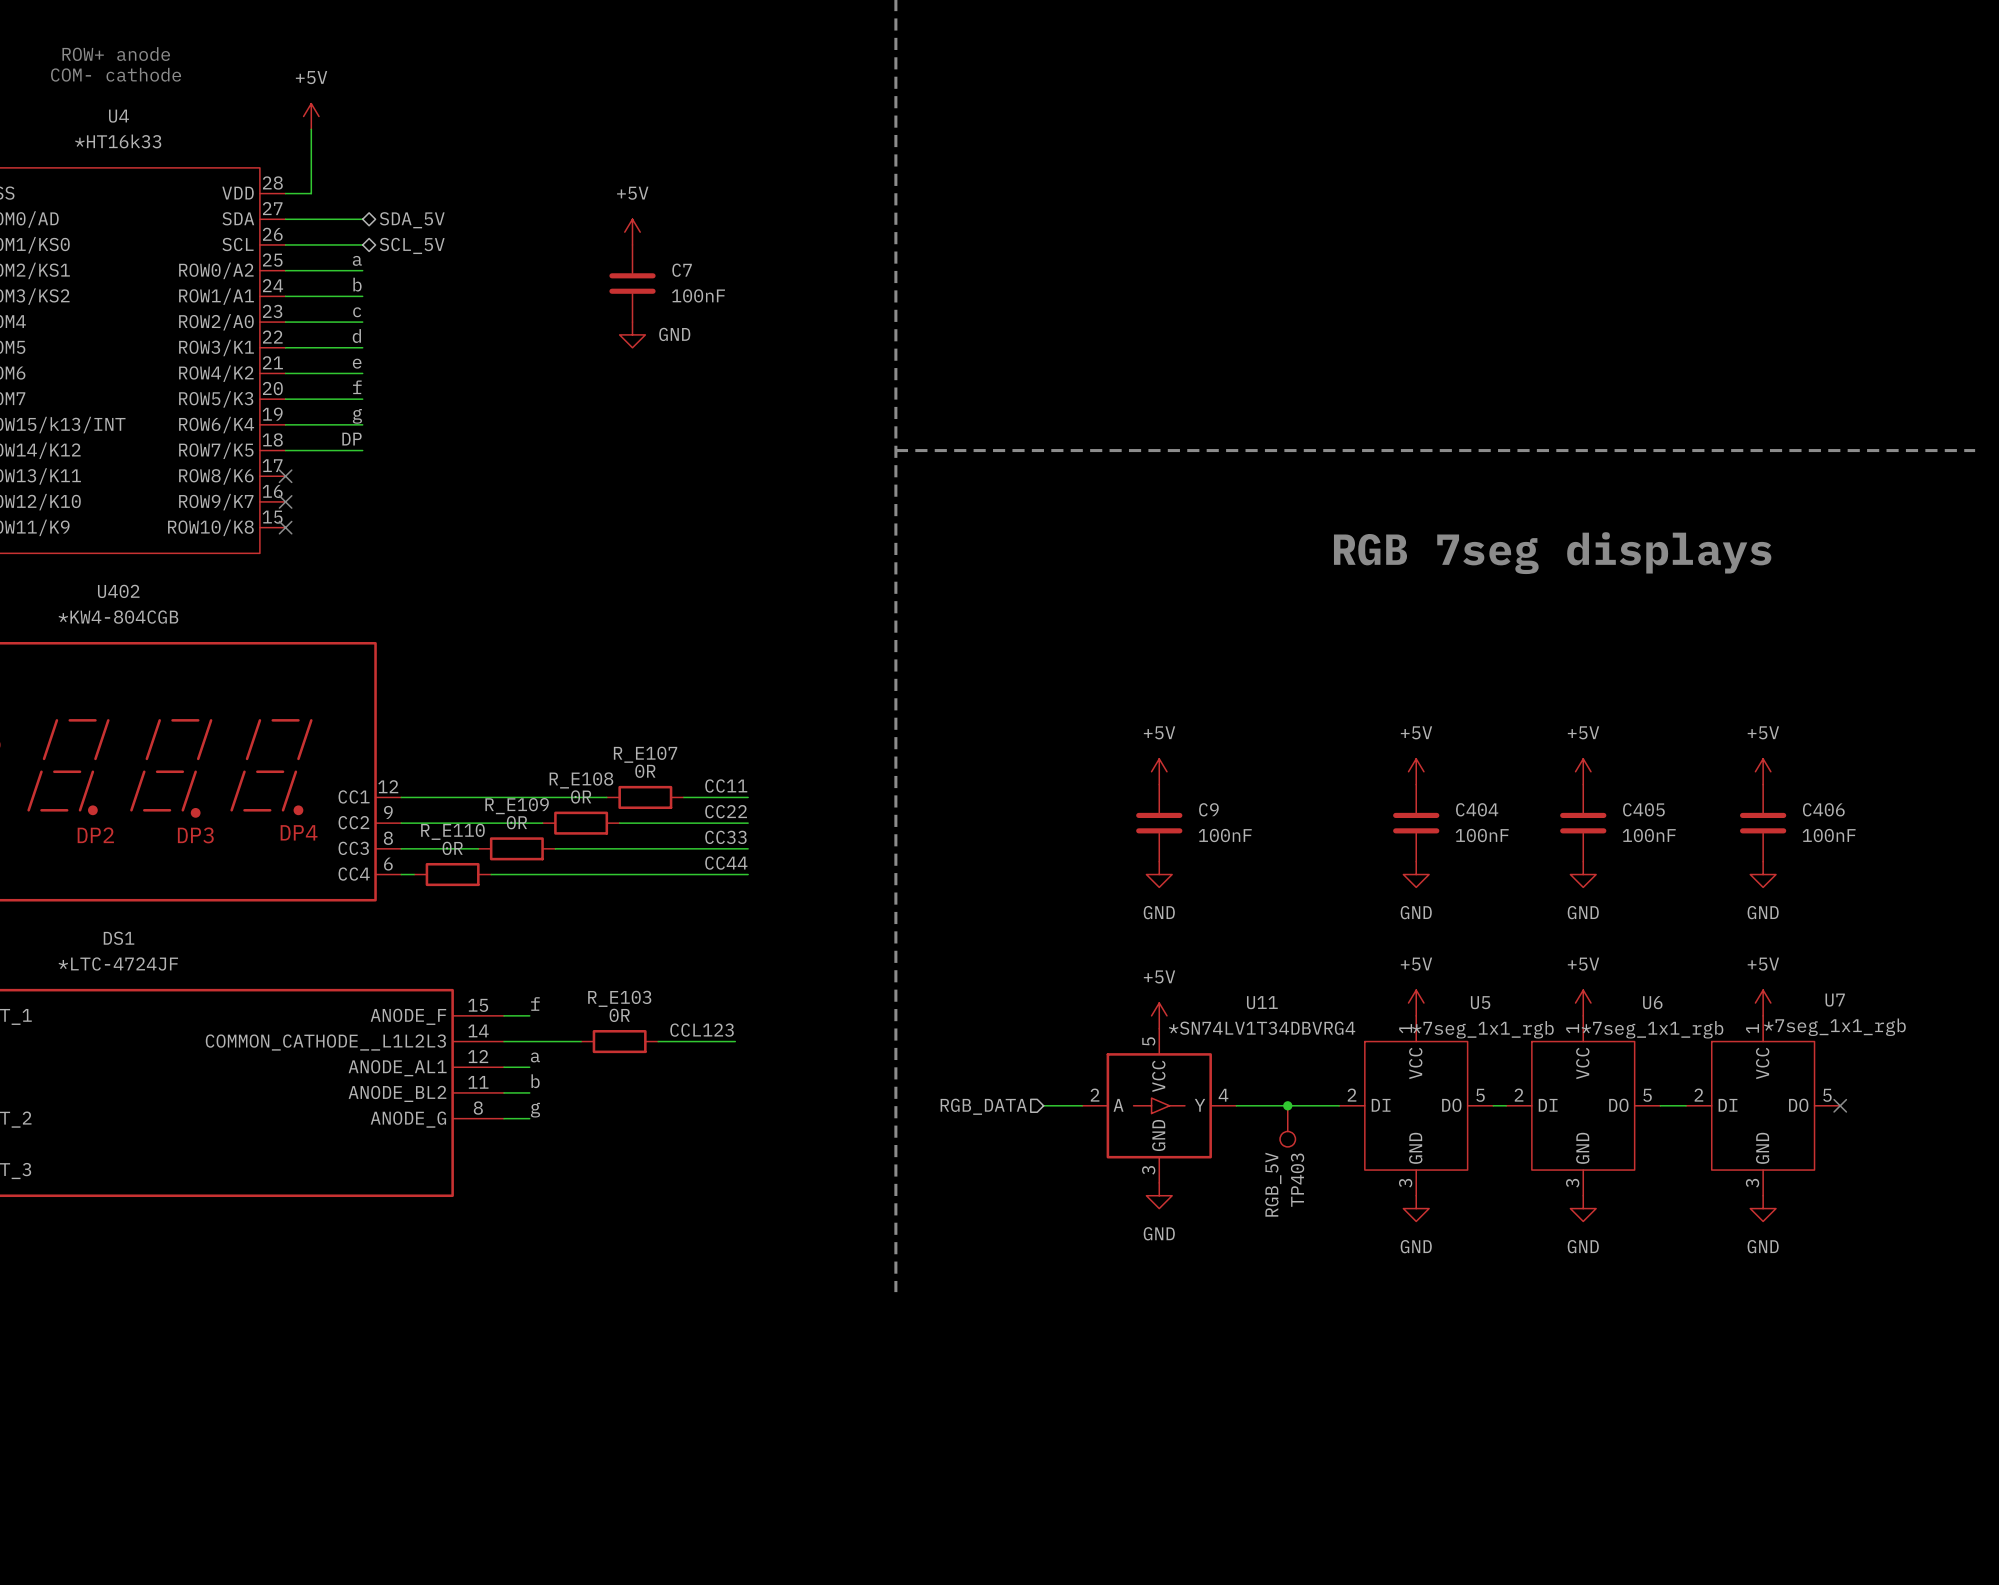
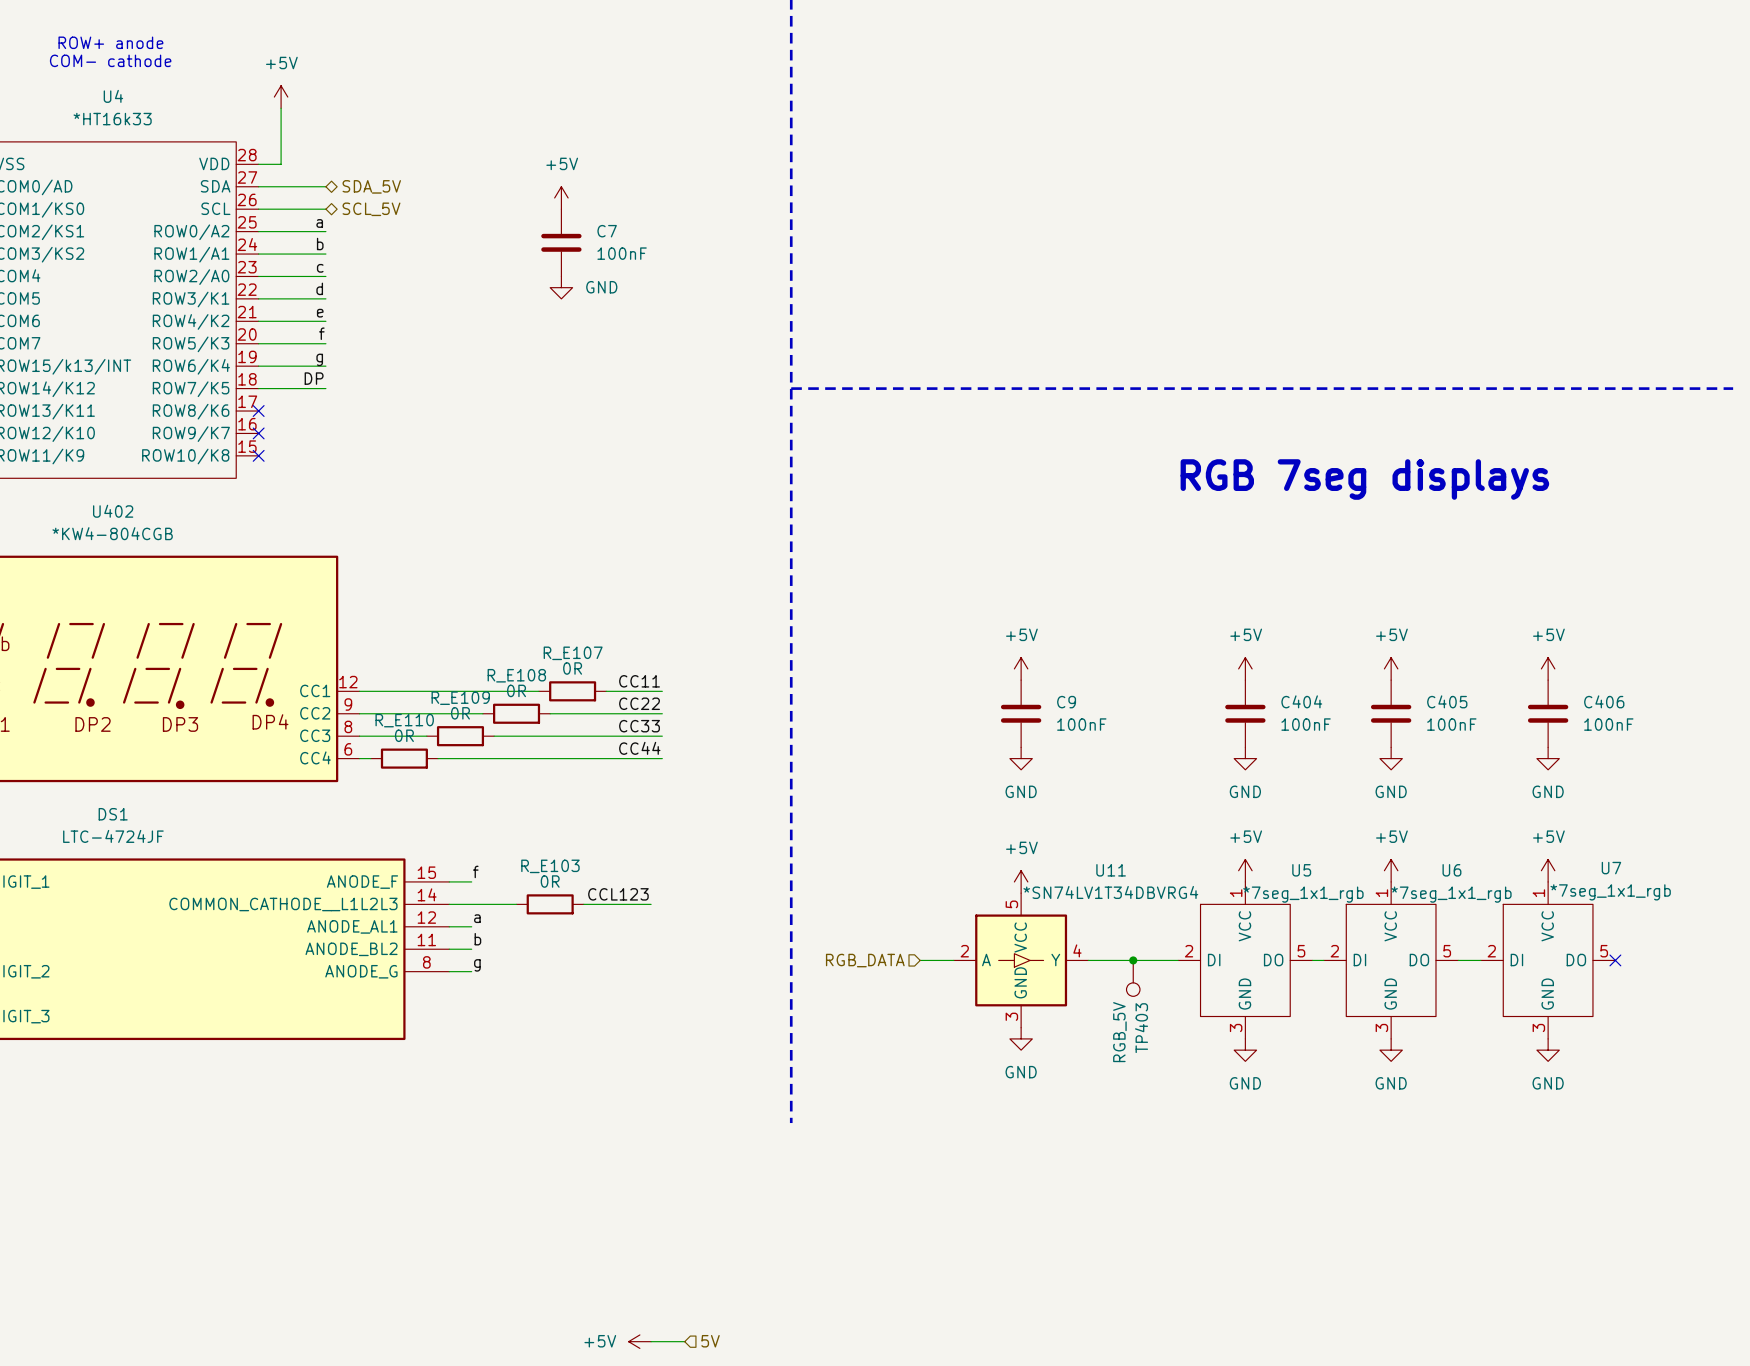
DS1 value: *LTC-4724JF (118, 963) -> LTC-4724JF (113, 836)
power symbol: none -> +5V (639, 1341)
wire: none -> (651, 1341) (684, 1341)
hierarchical label: none -> 5V (710, 1341)

